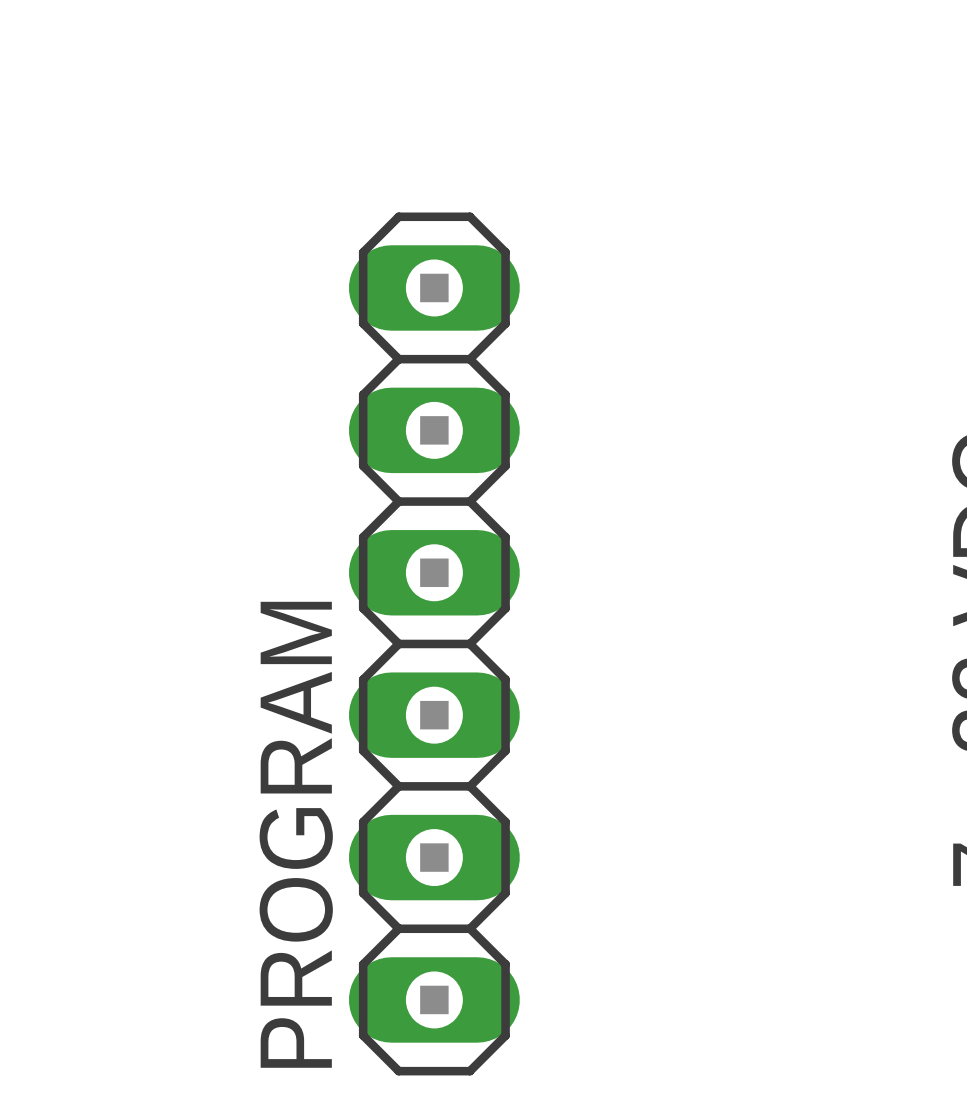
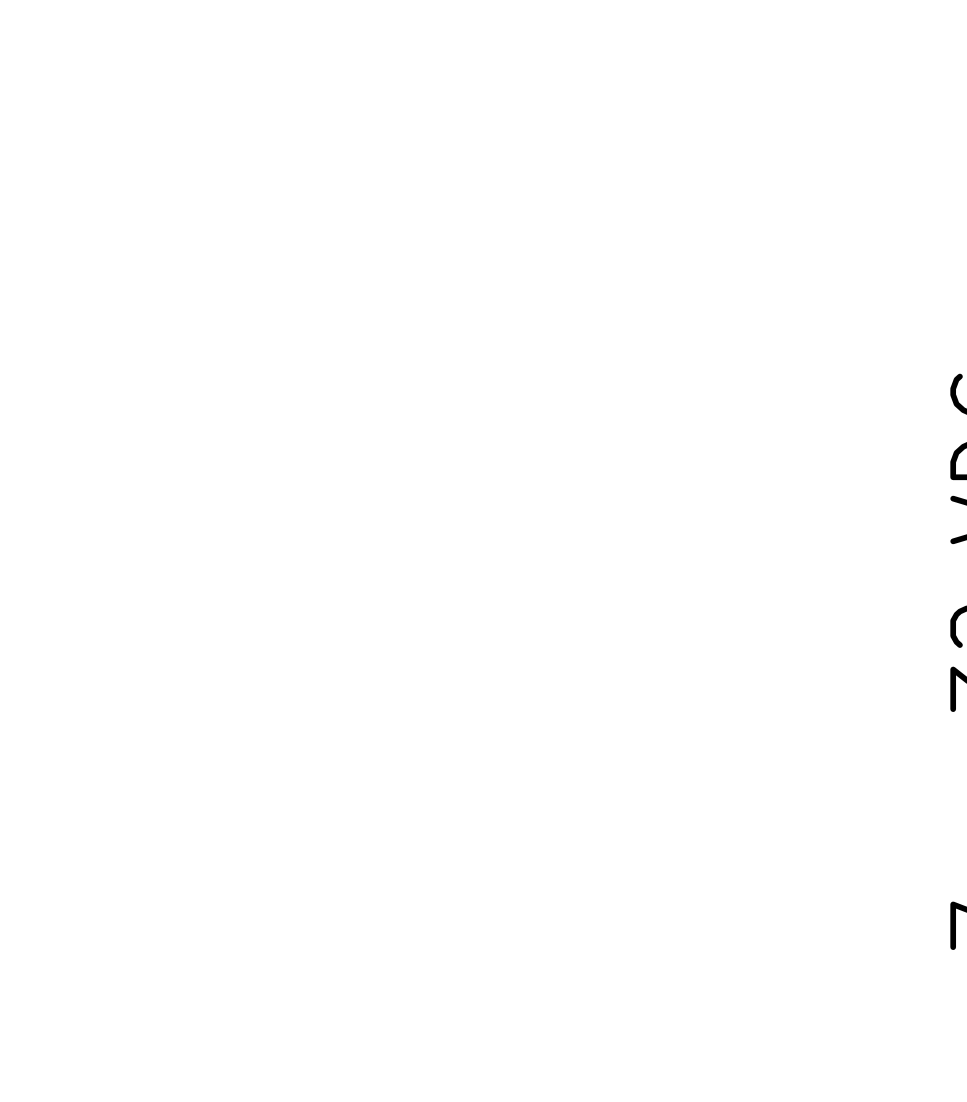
PROGRAM: (434, 643) -> none

